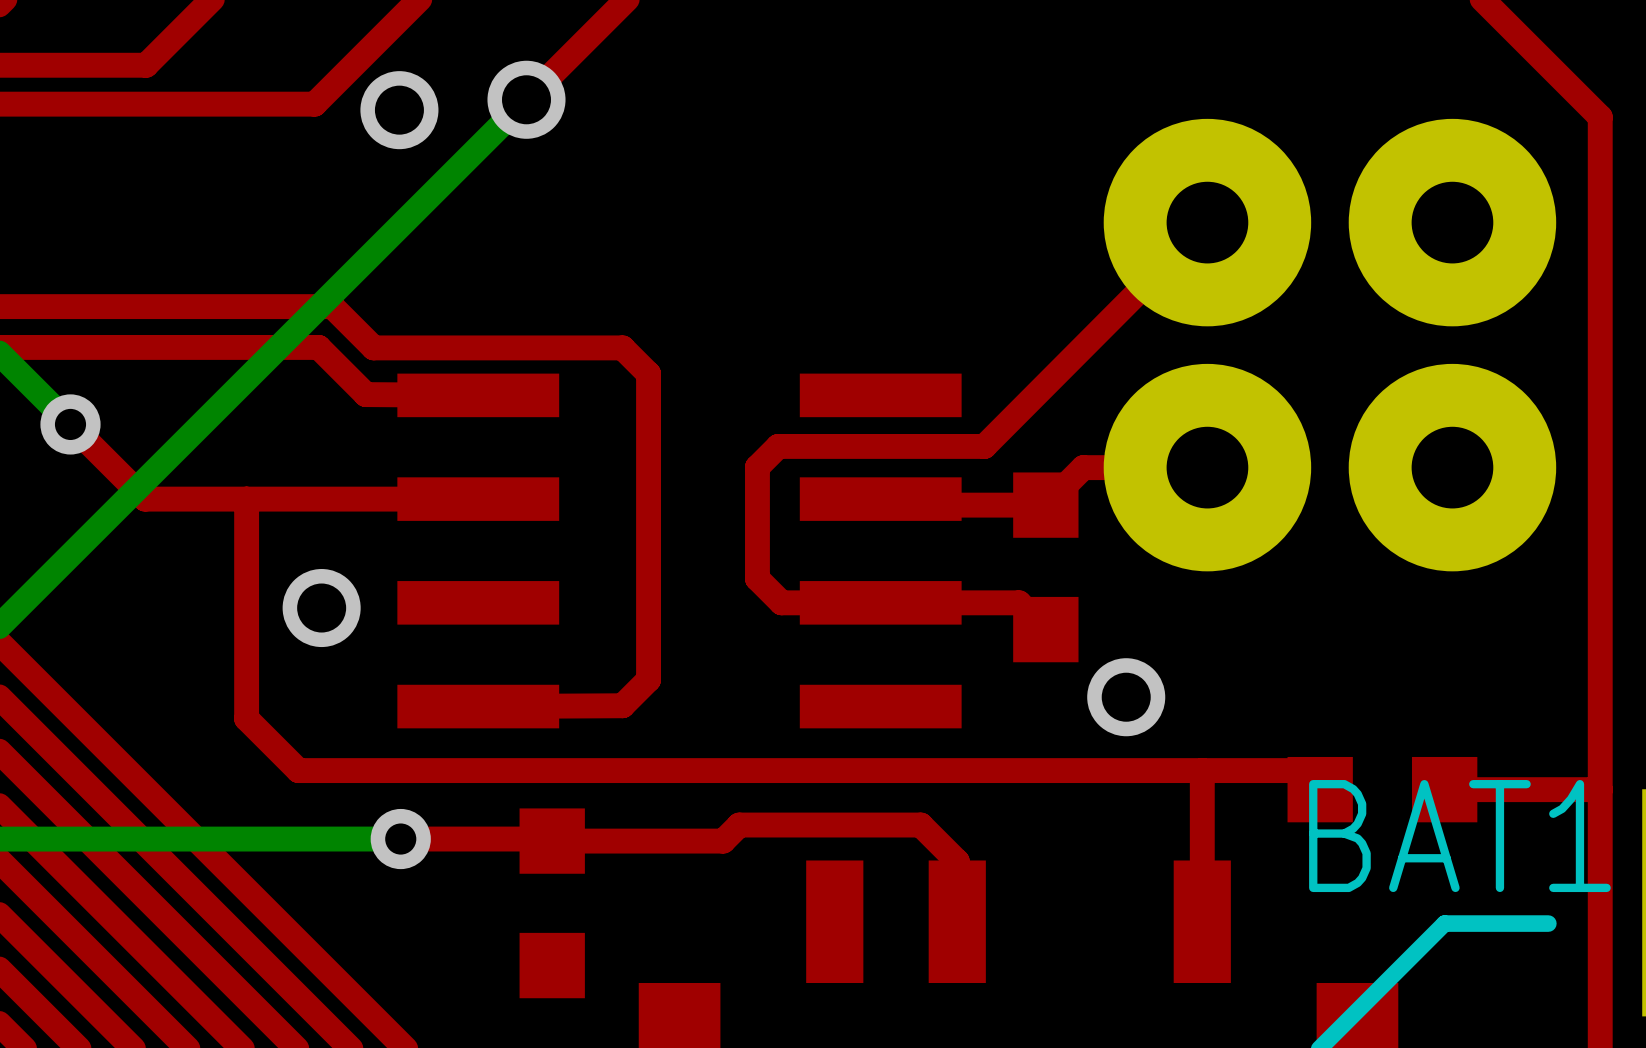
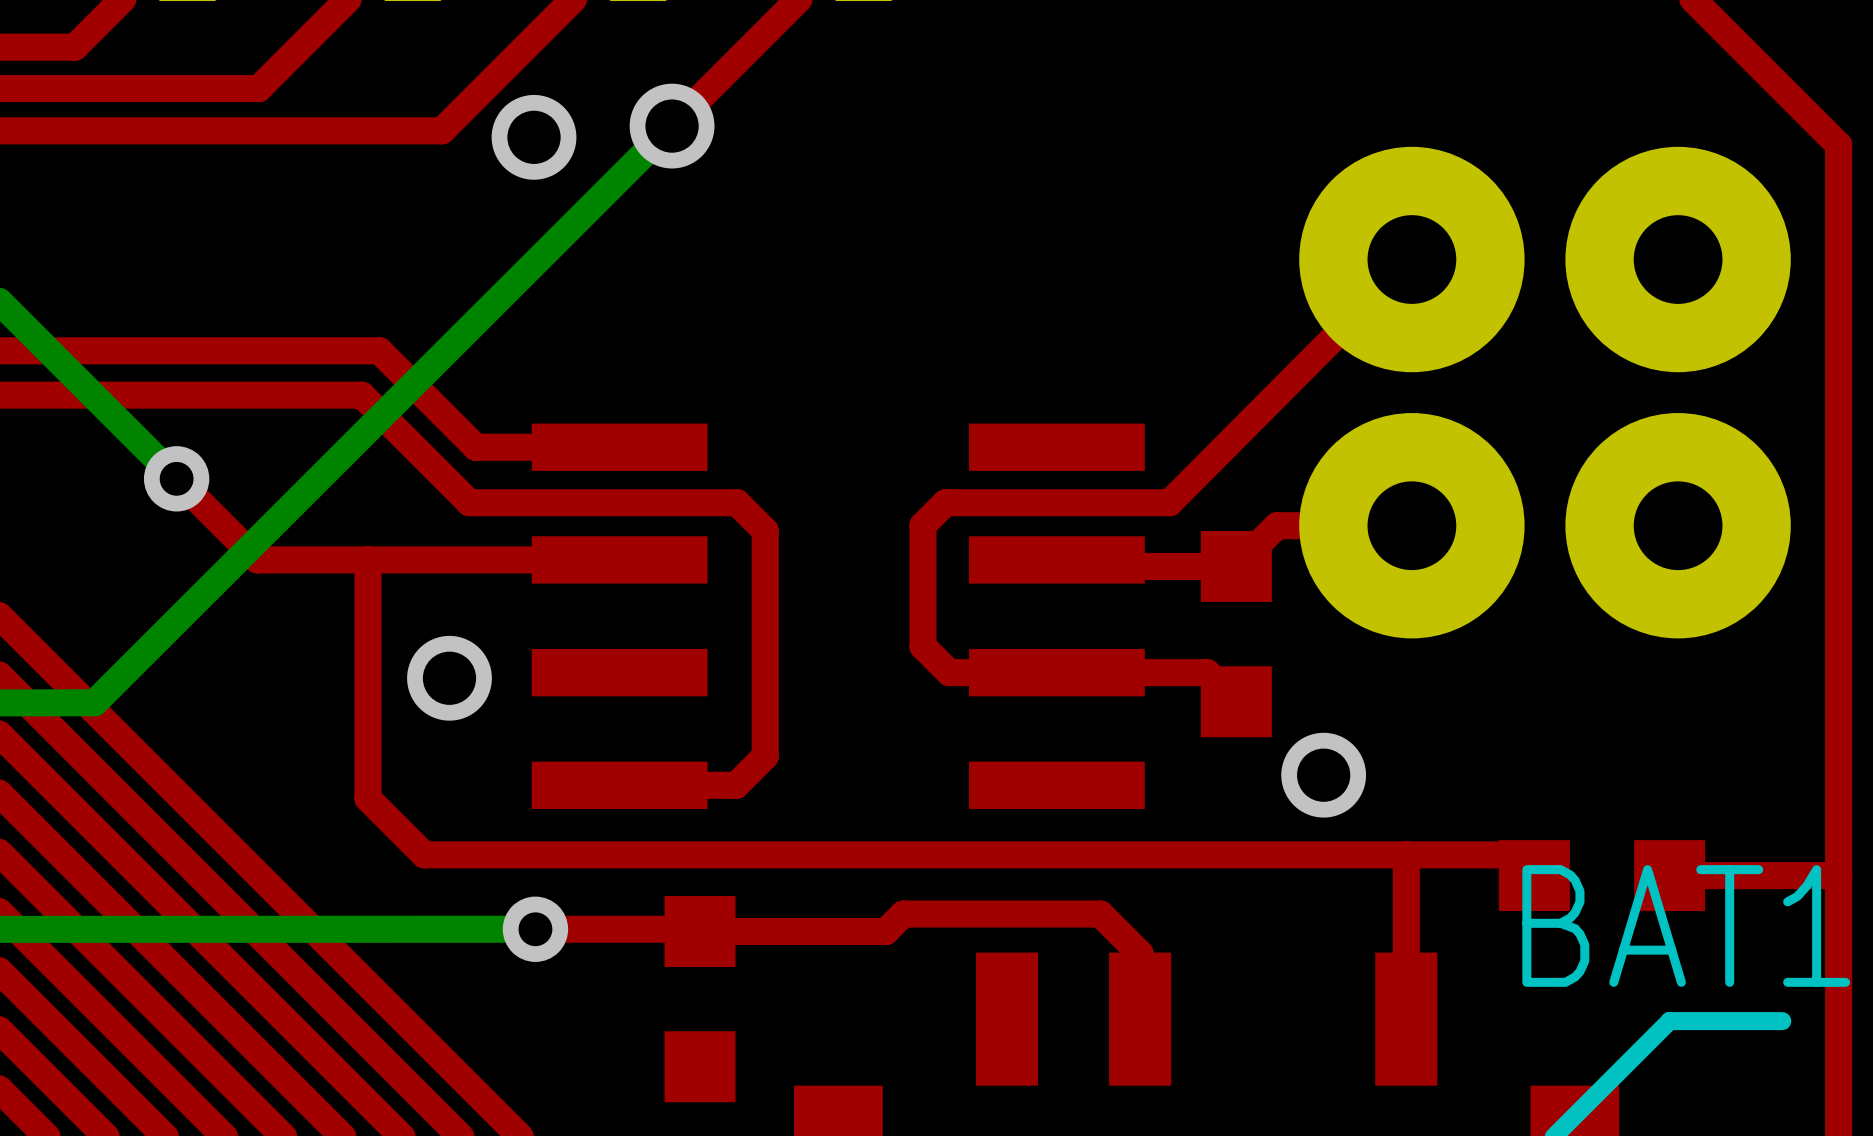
top track: (257, 306) (332, 306) (373, 347) (622, 347) (648, 373) (648, 679) (622, 705) (478, 706) -> (361, 395) (469, 502) (737, 502) (765, 530) (765, 756) (736, 785) (619, 785)
top track: (240, 347) (318, 347) (365, 394) (478, 395) -> (379, 350) (475, 447) (619, 447)

